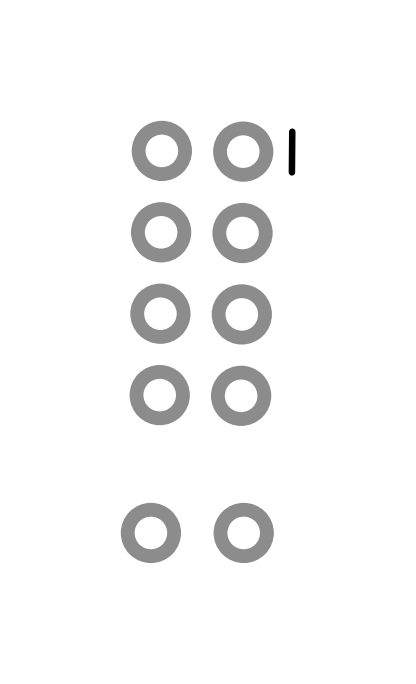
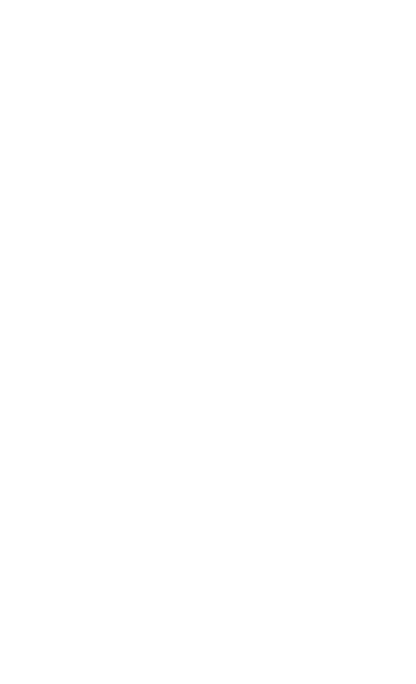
part: (212, 273) -> none
part: (197, 532) -> none

